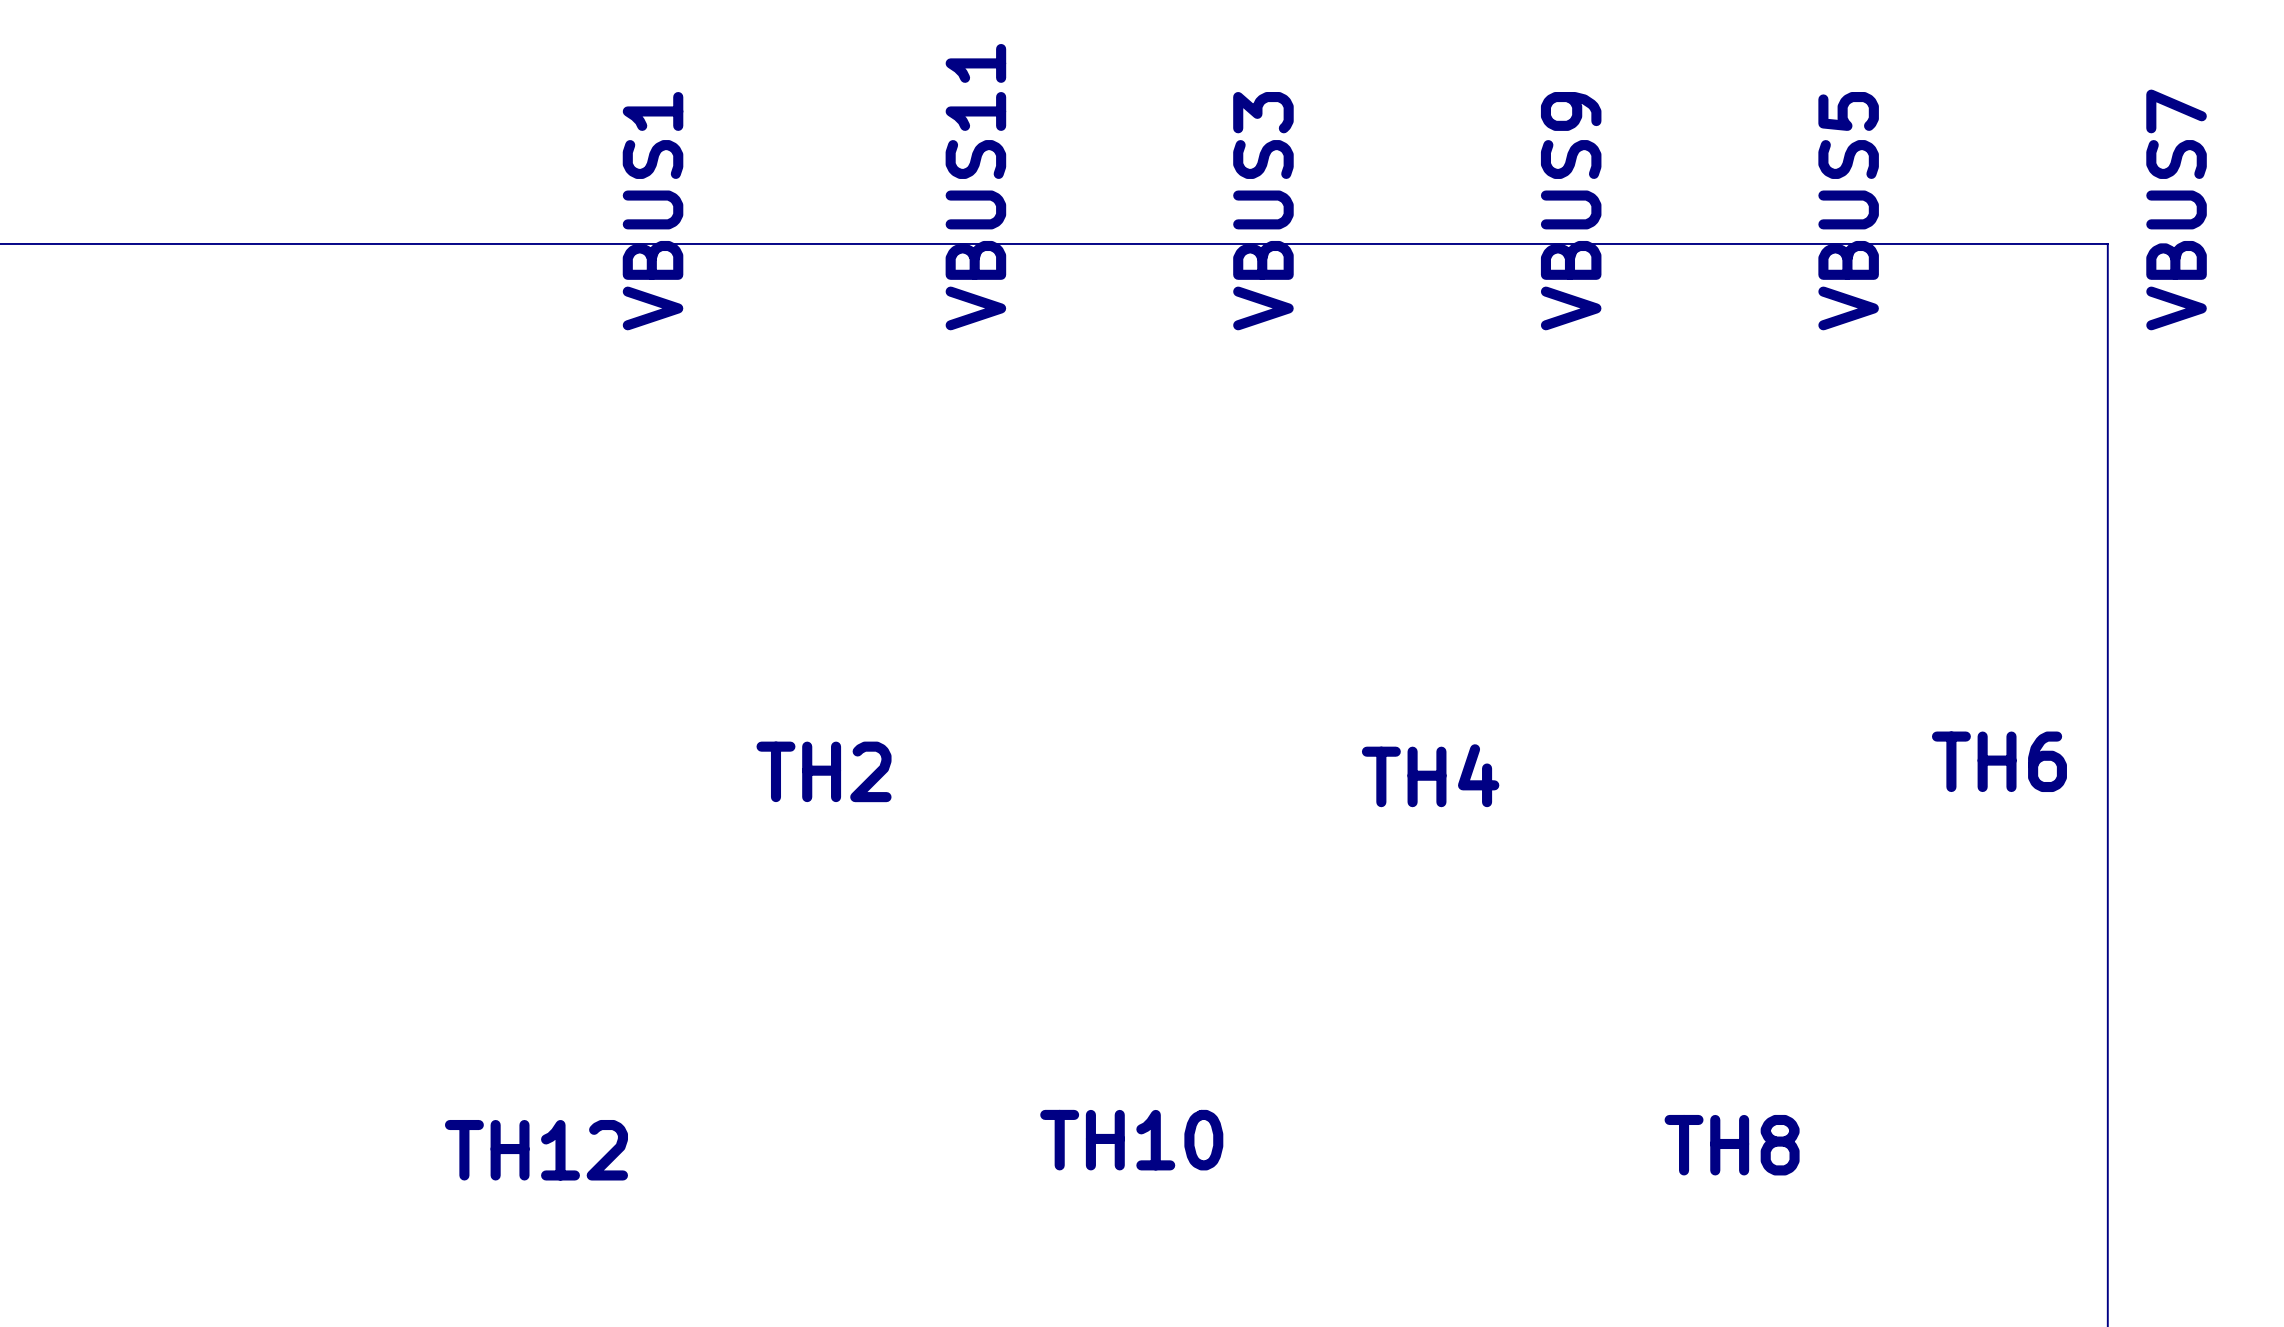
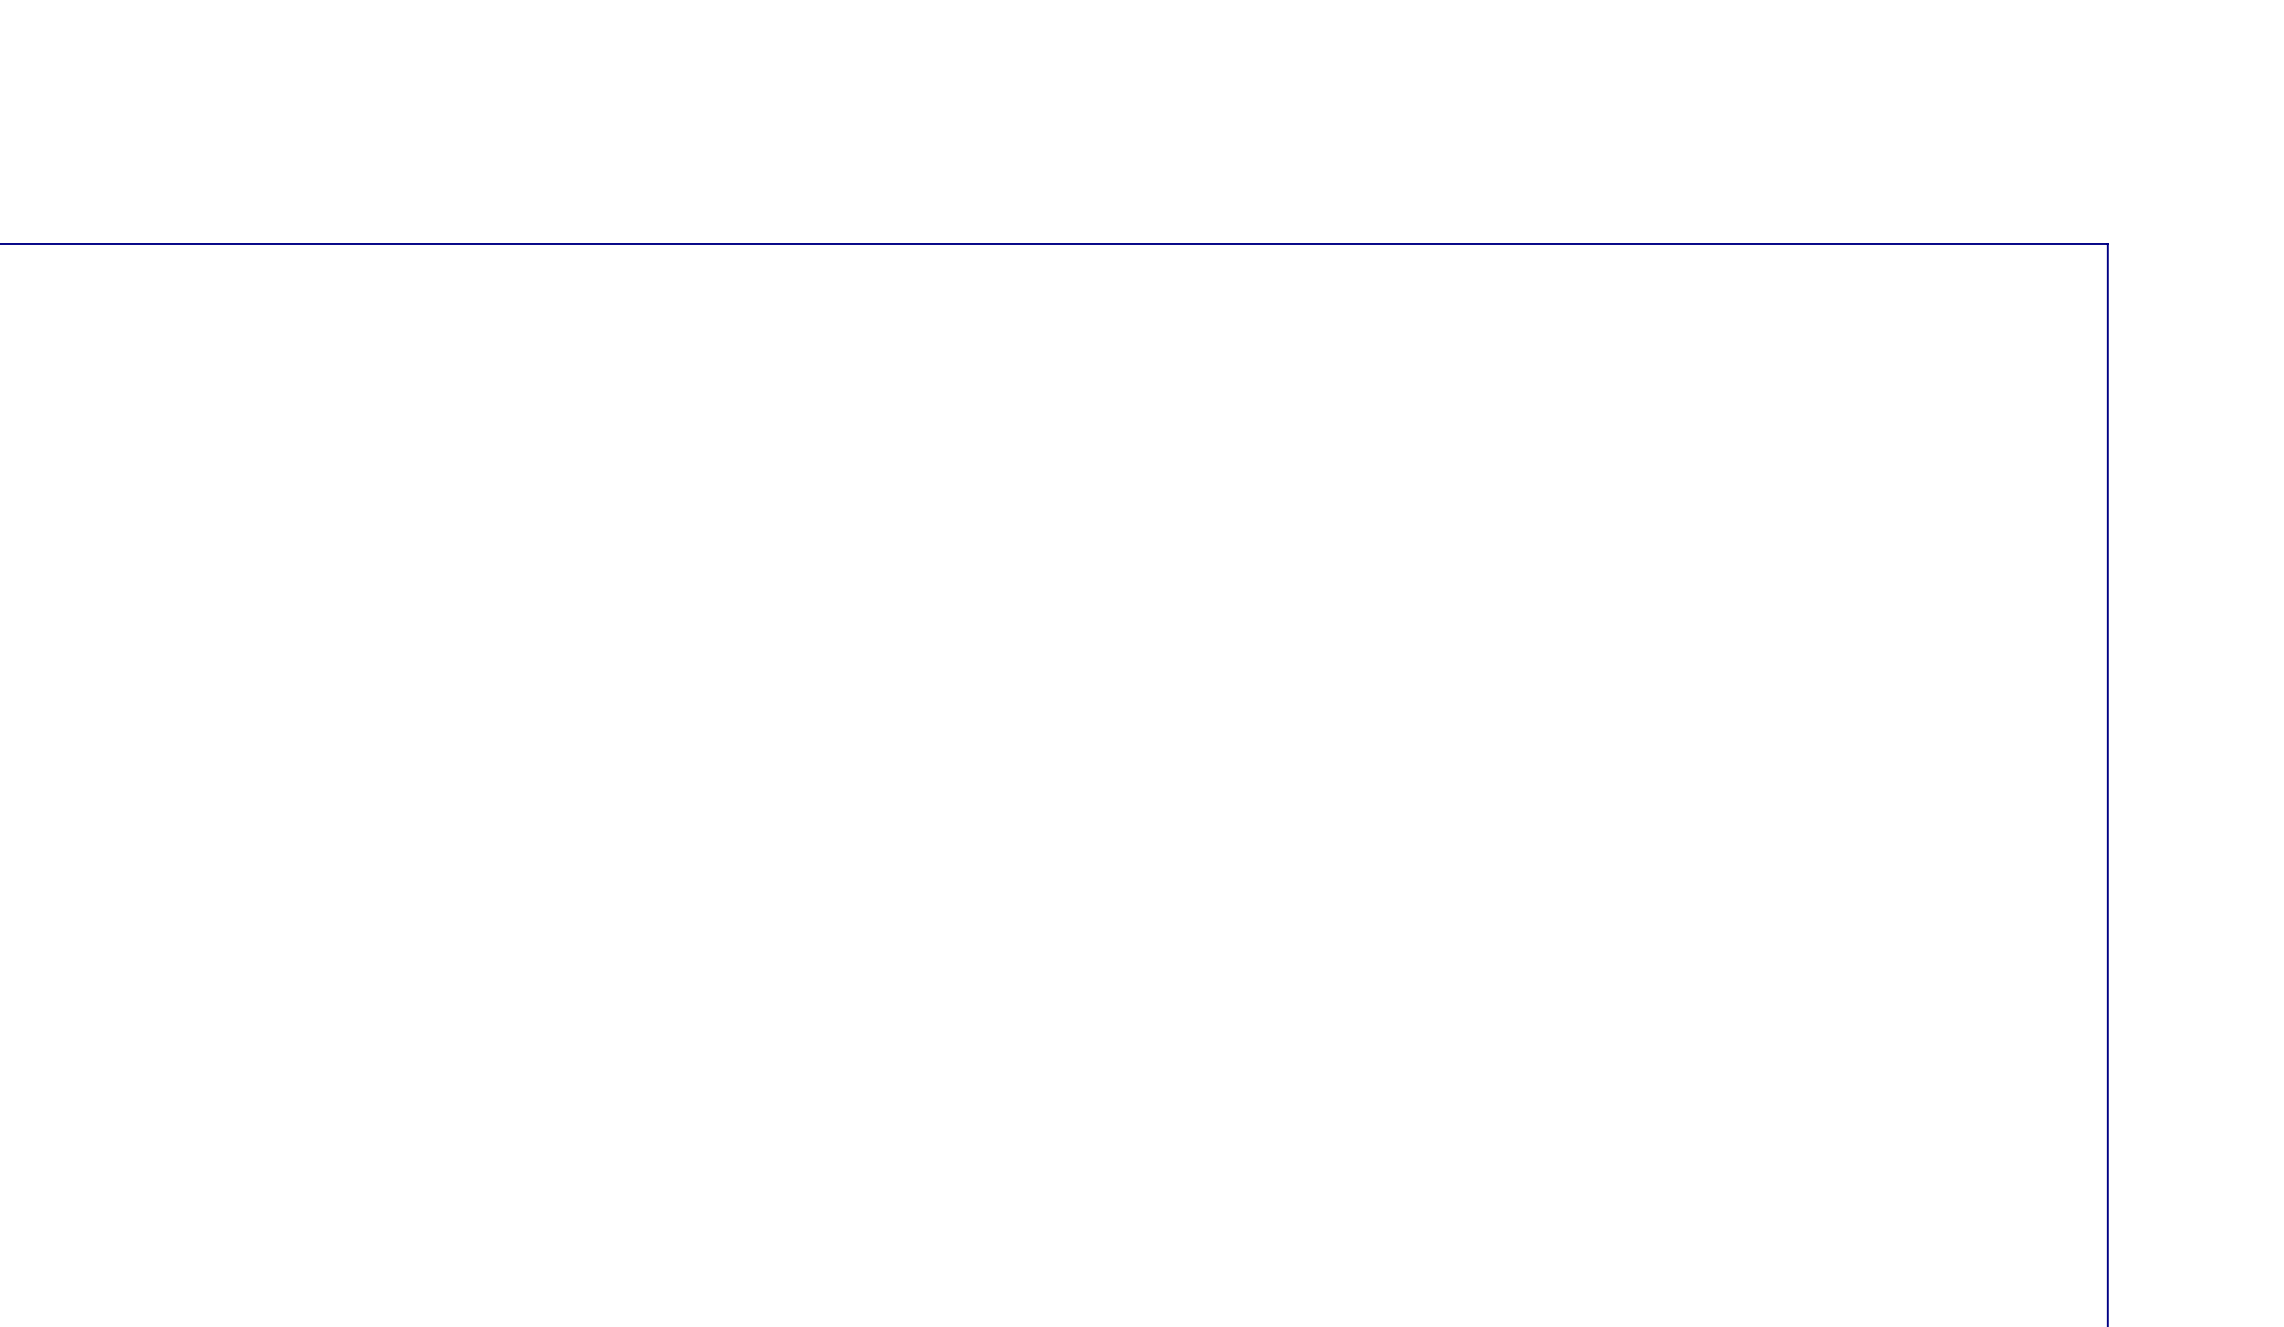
text: VBUS11 (975, 187) -> none
text: VBUS7 (2176, 209) -> none
text: VBUS1 (653, 211) -> none
text: VBUS3 (1263, 211) -> none
text: VBUS9 (1571, 211) -> none
text: VBUS5 (1848, 211) -> none
text: TH6 (1999, 761) -> none
text: TH2 (824, 771) -> none
text: TH4 (1430, 775) -> none
text: TH10 (1131, 1140) -> none
text: TH8 (1732, 1145) -> none
text: TH12 (536, 1150) -> none

